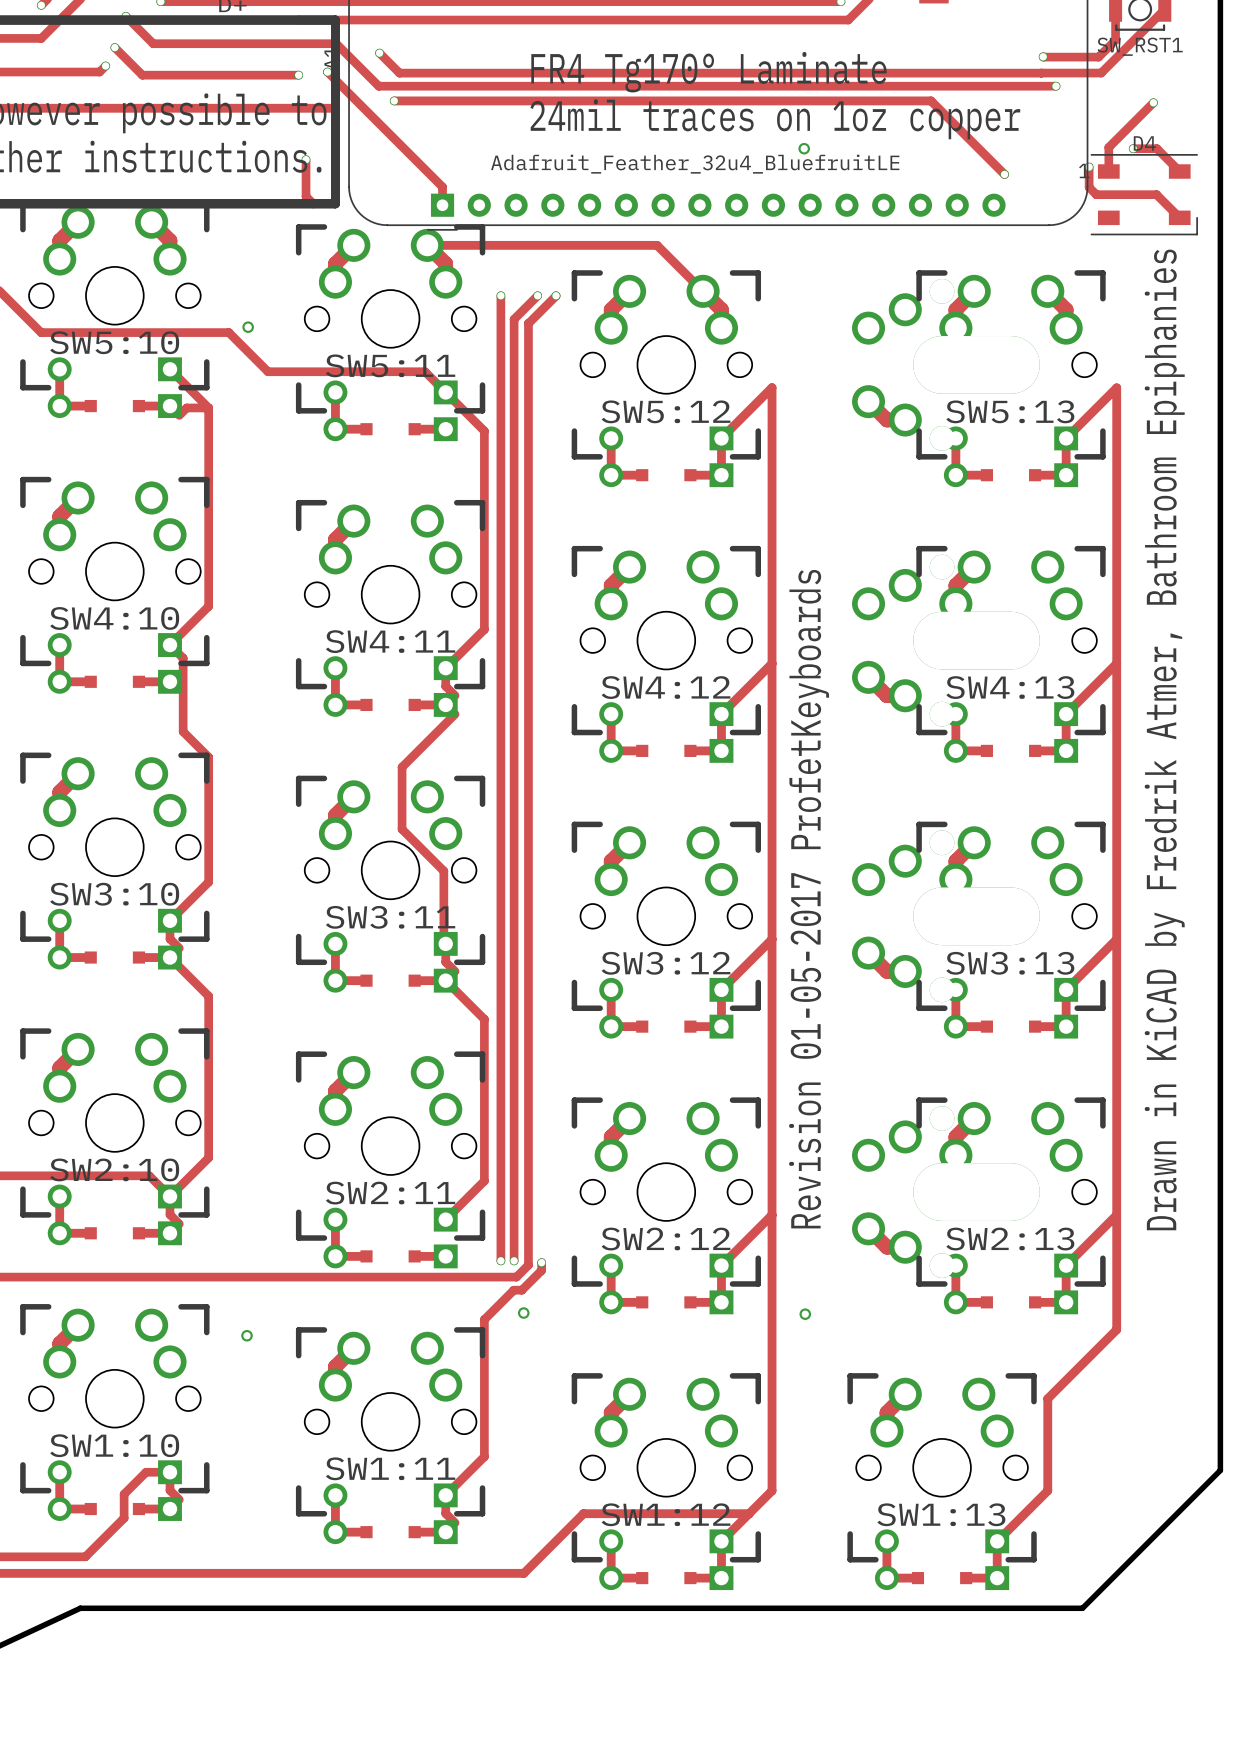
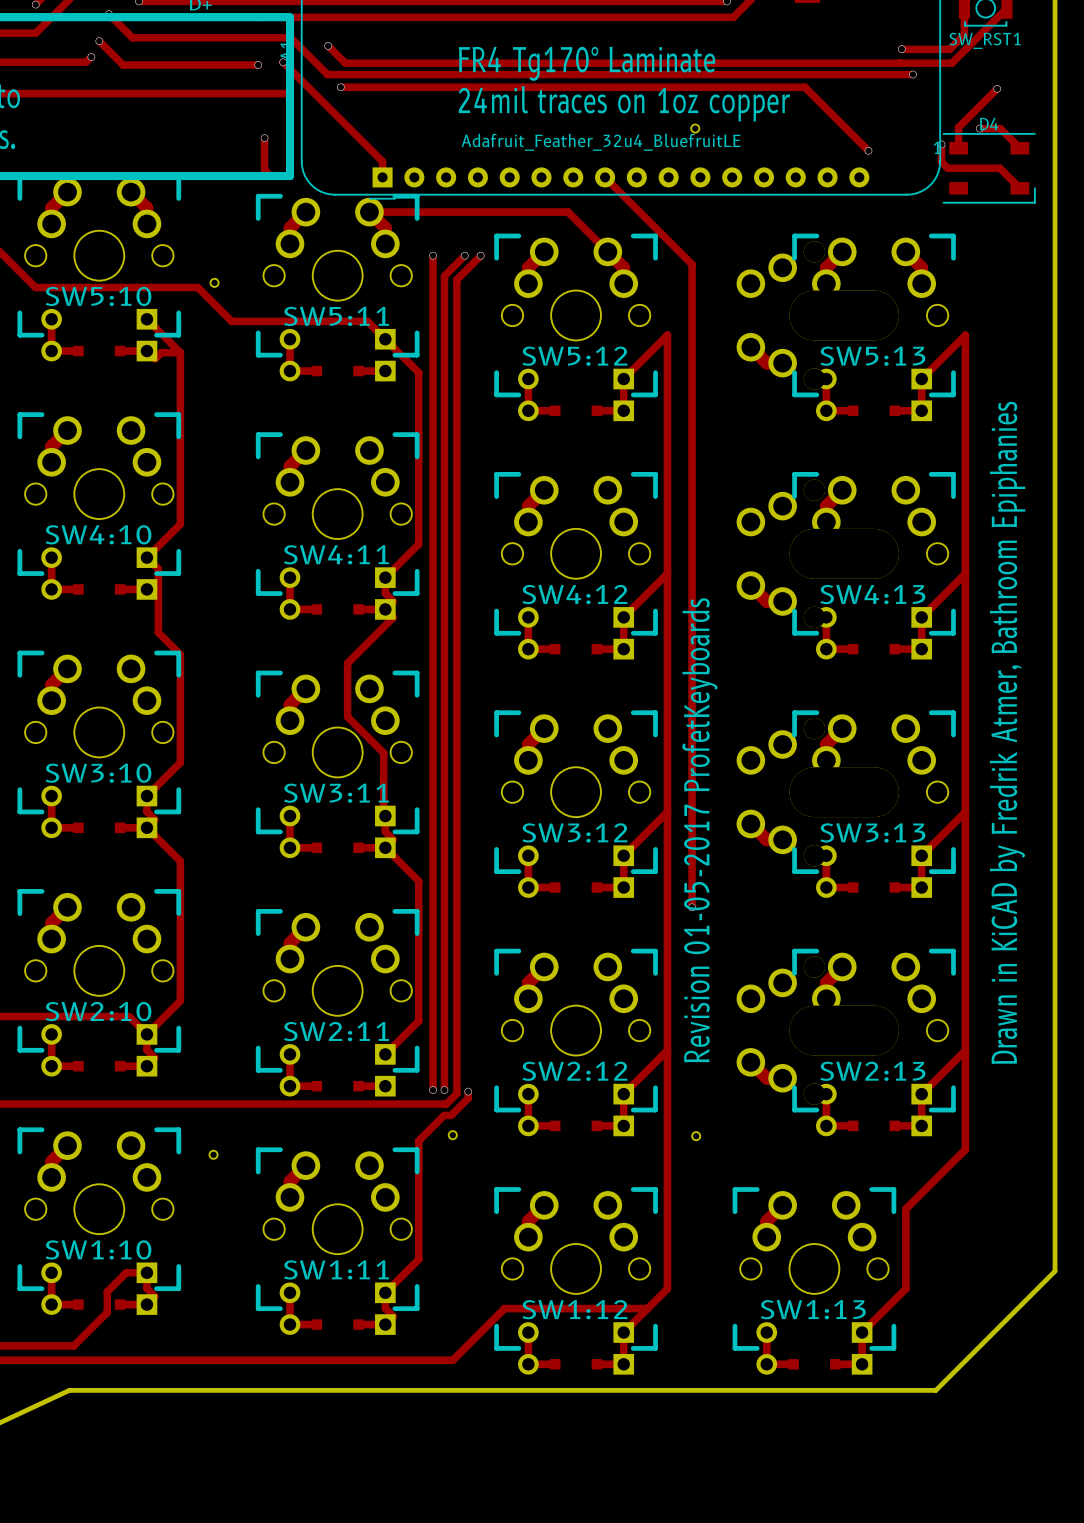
track: none -> (605, 177) (692, 264) (692, 907)
via: none -> (692, 907)

